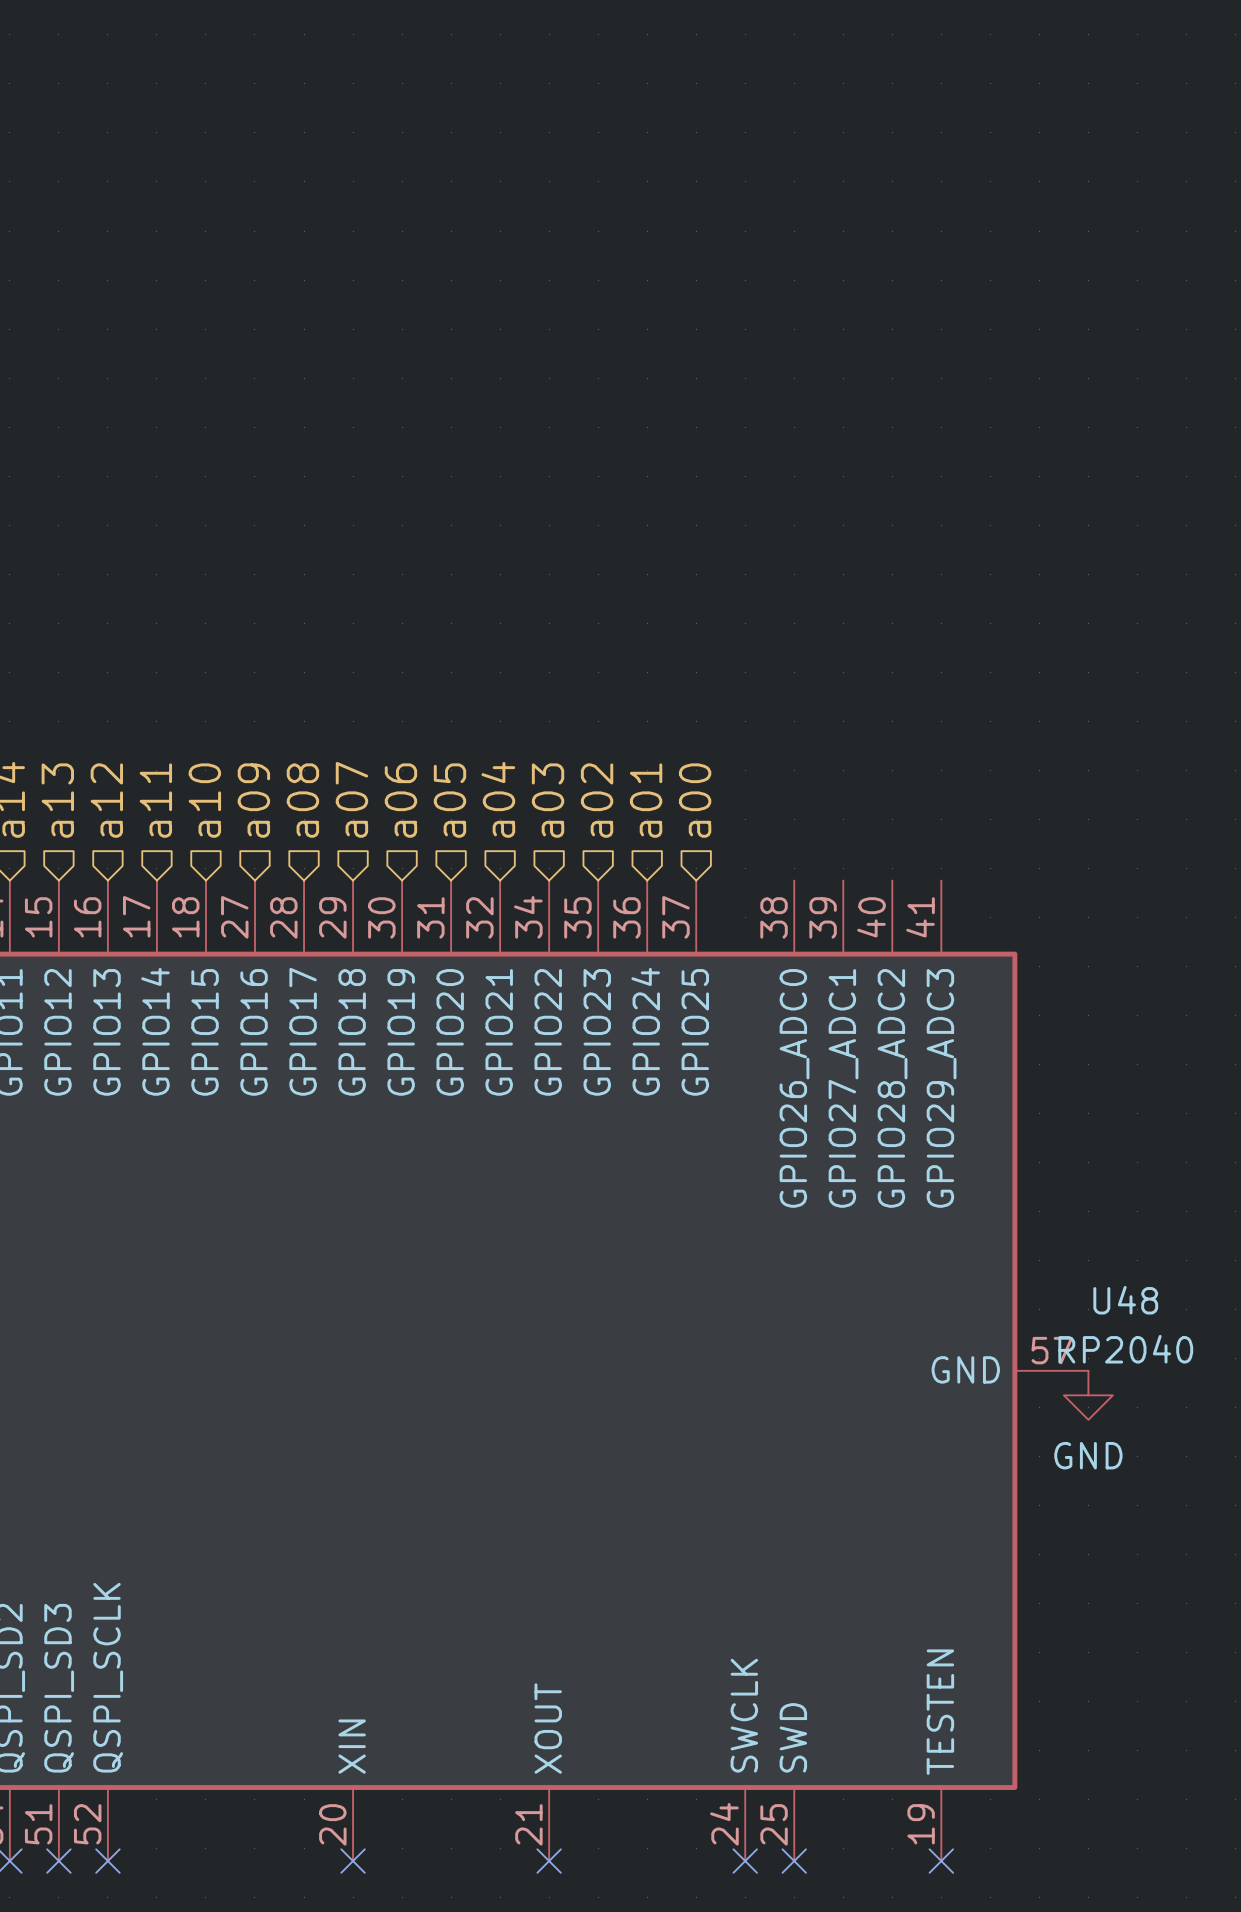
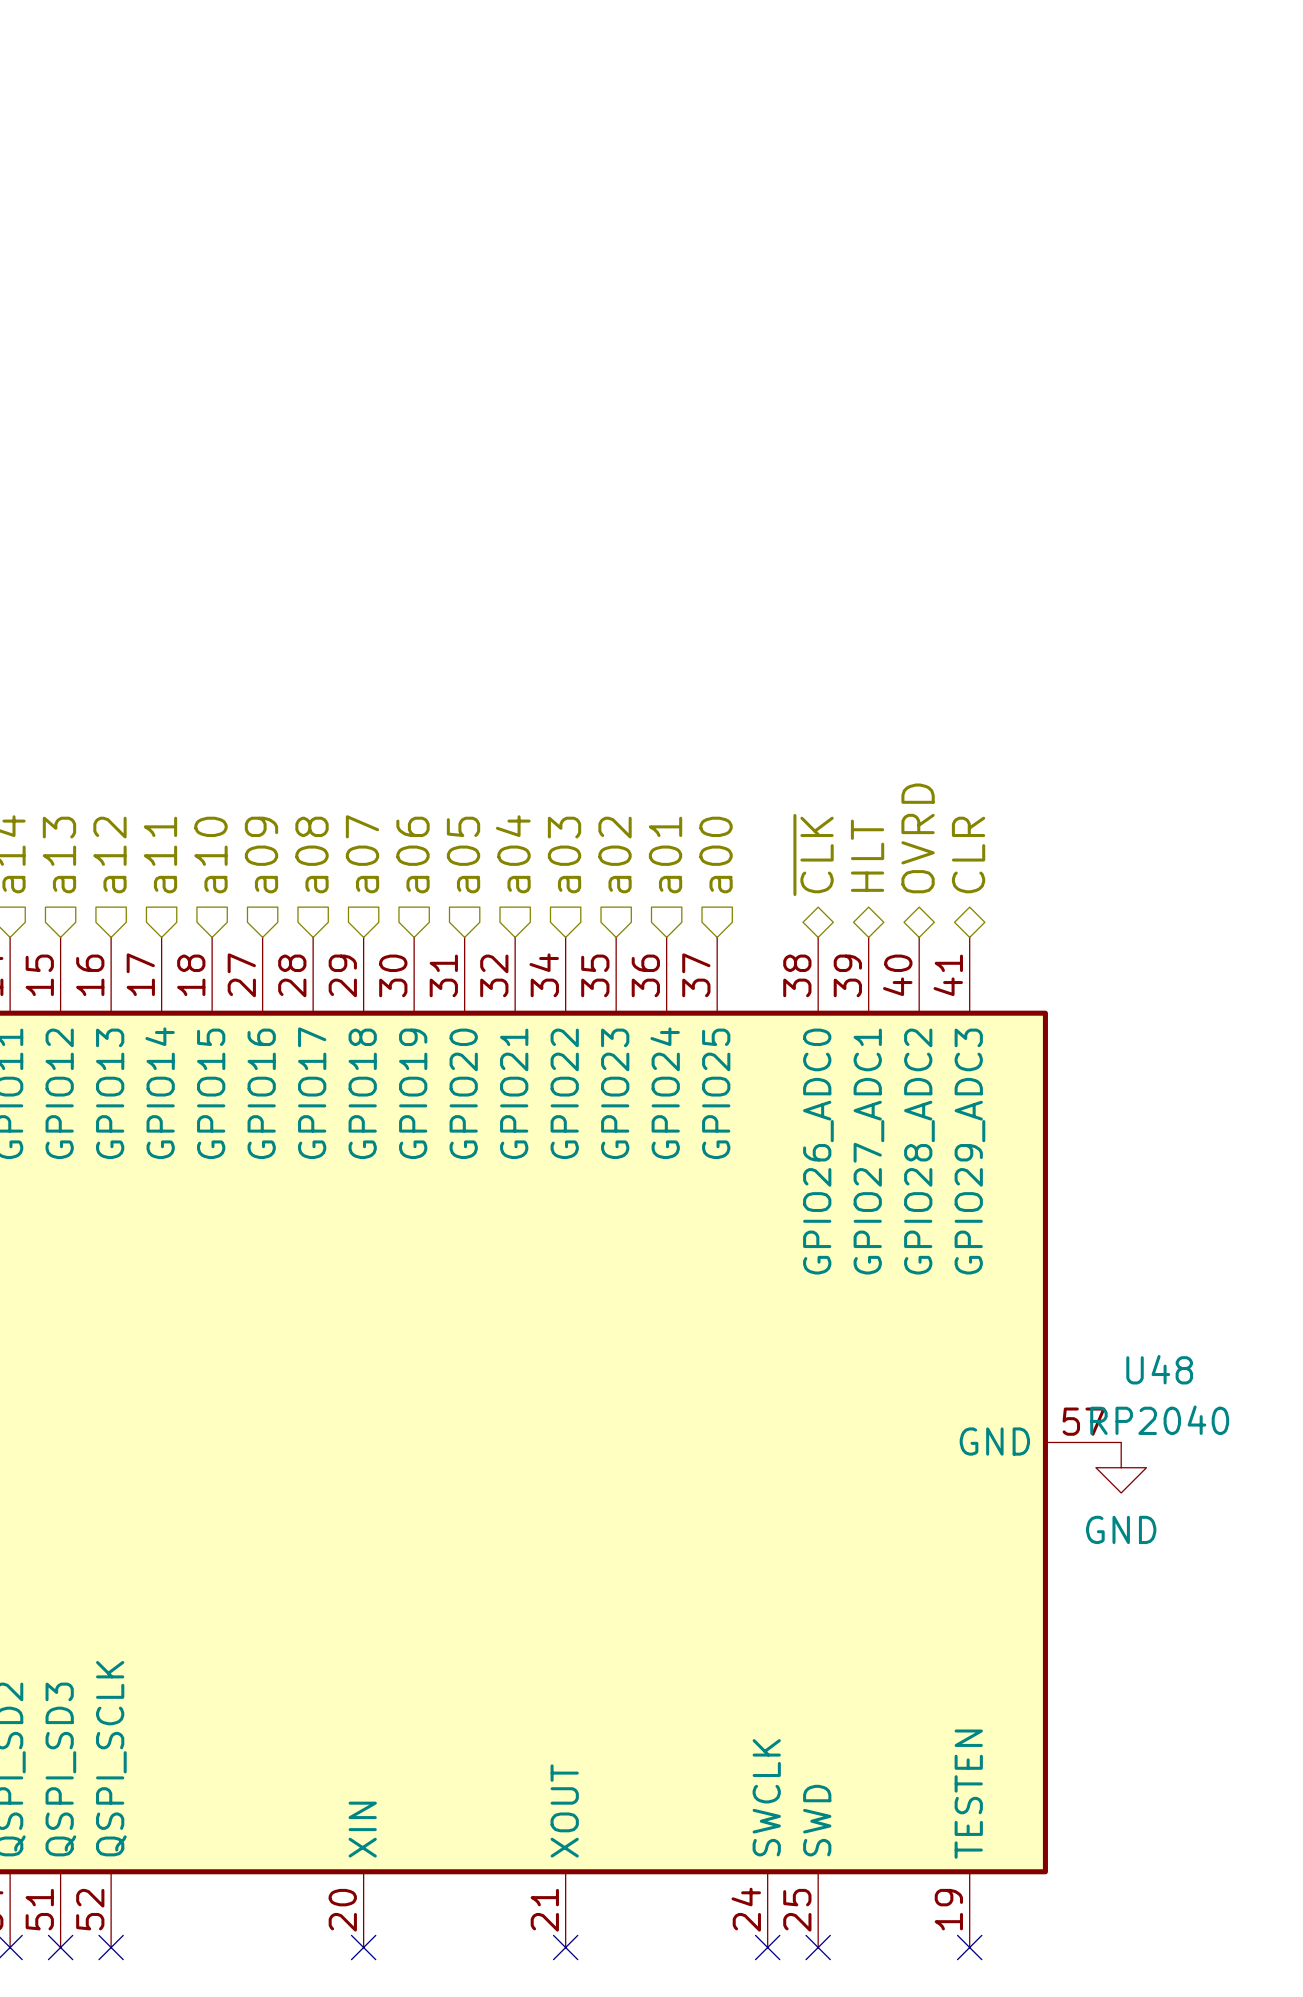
hierarchical label: none -> OVRD (918, 838)
hierarchical label: none -> ~{CLK} (813, 854)
hierarchical label: none -> CLR (968, 854)
hierarchical label: none -> HLT (867, 855)

